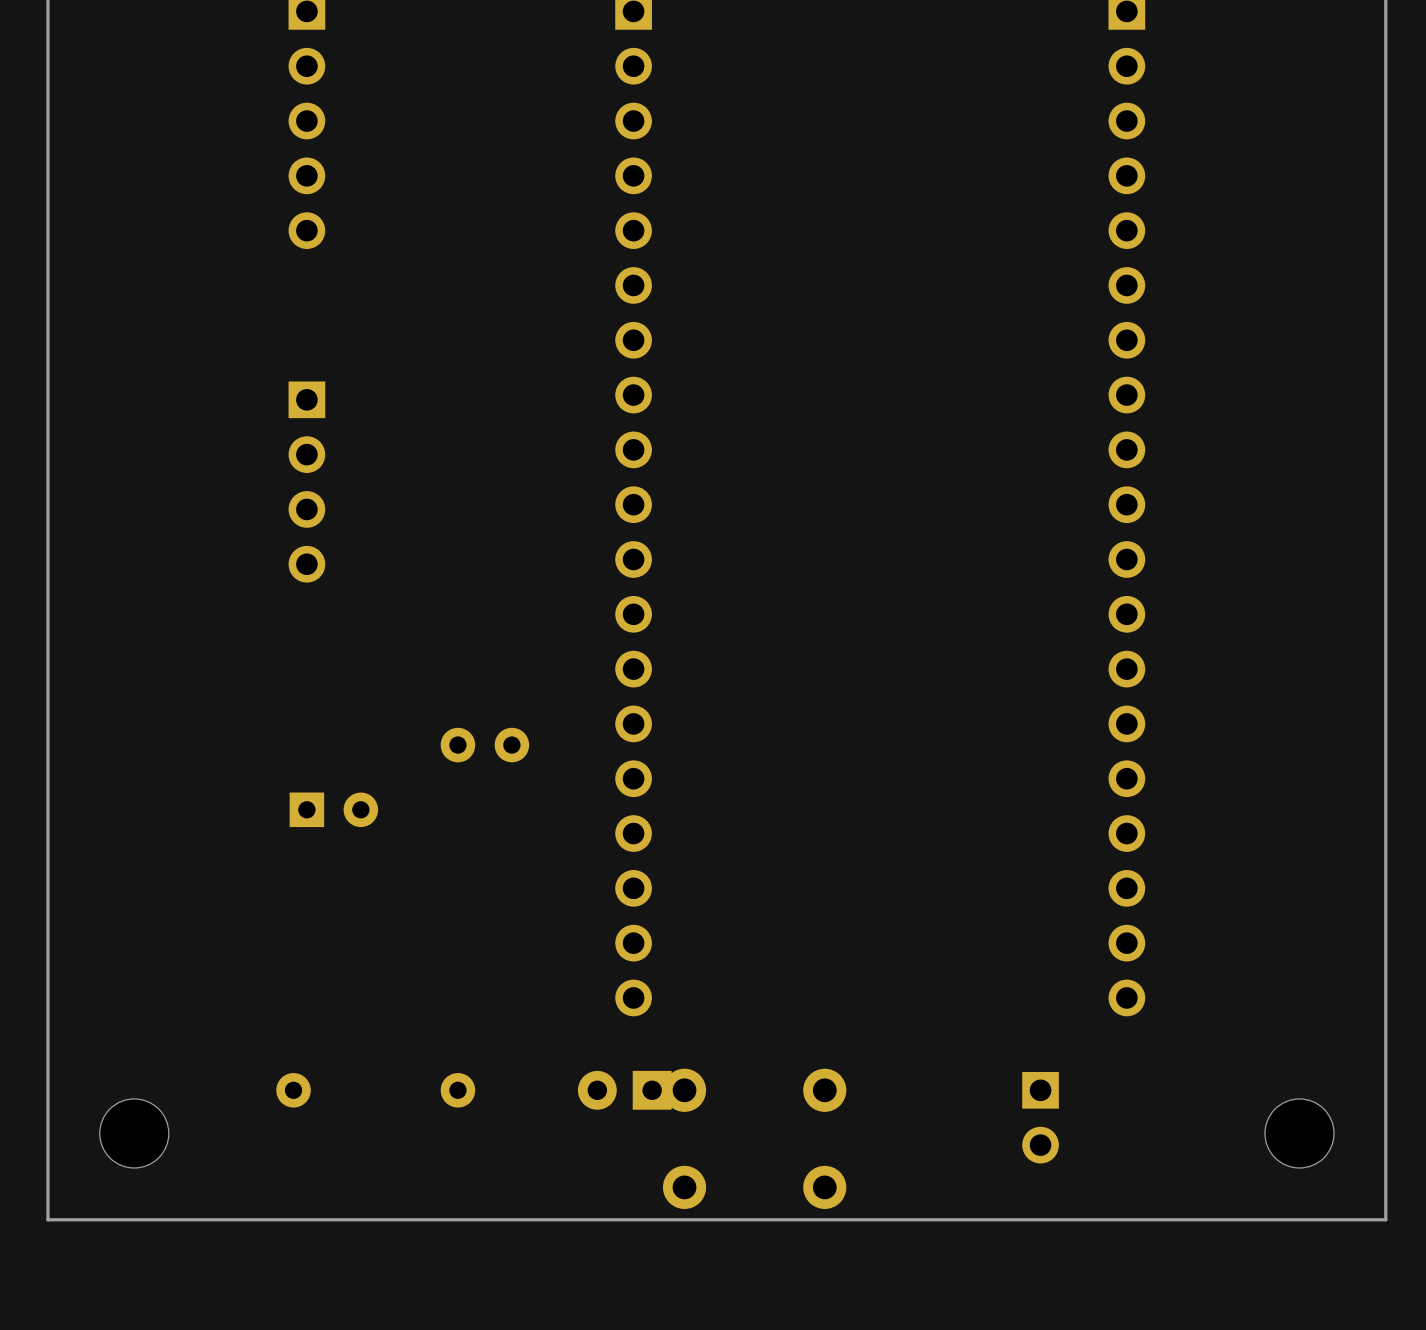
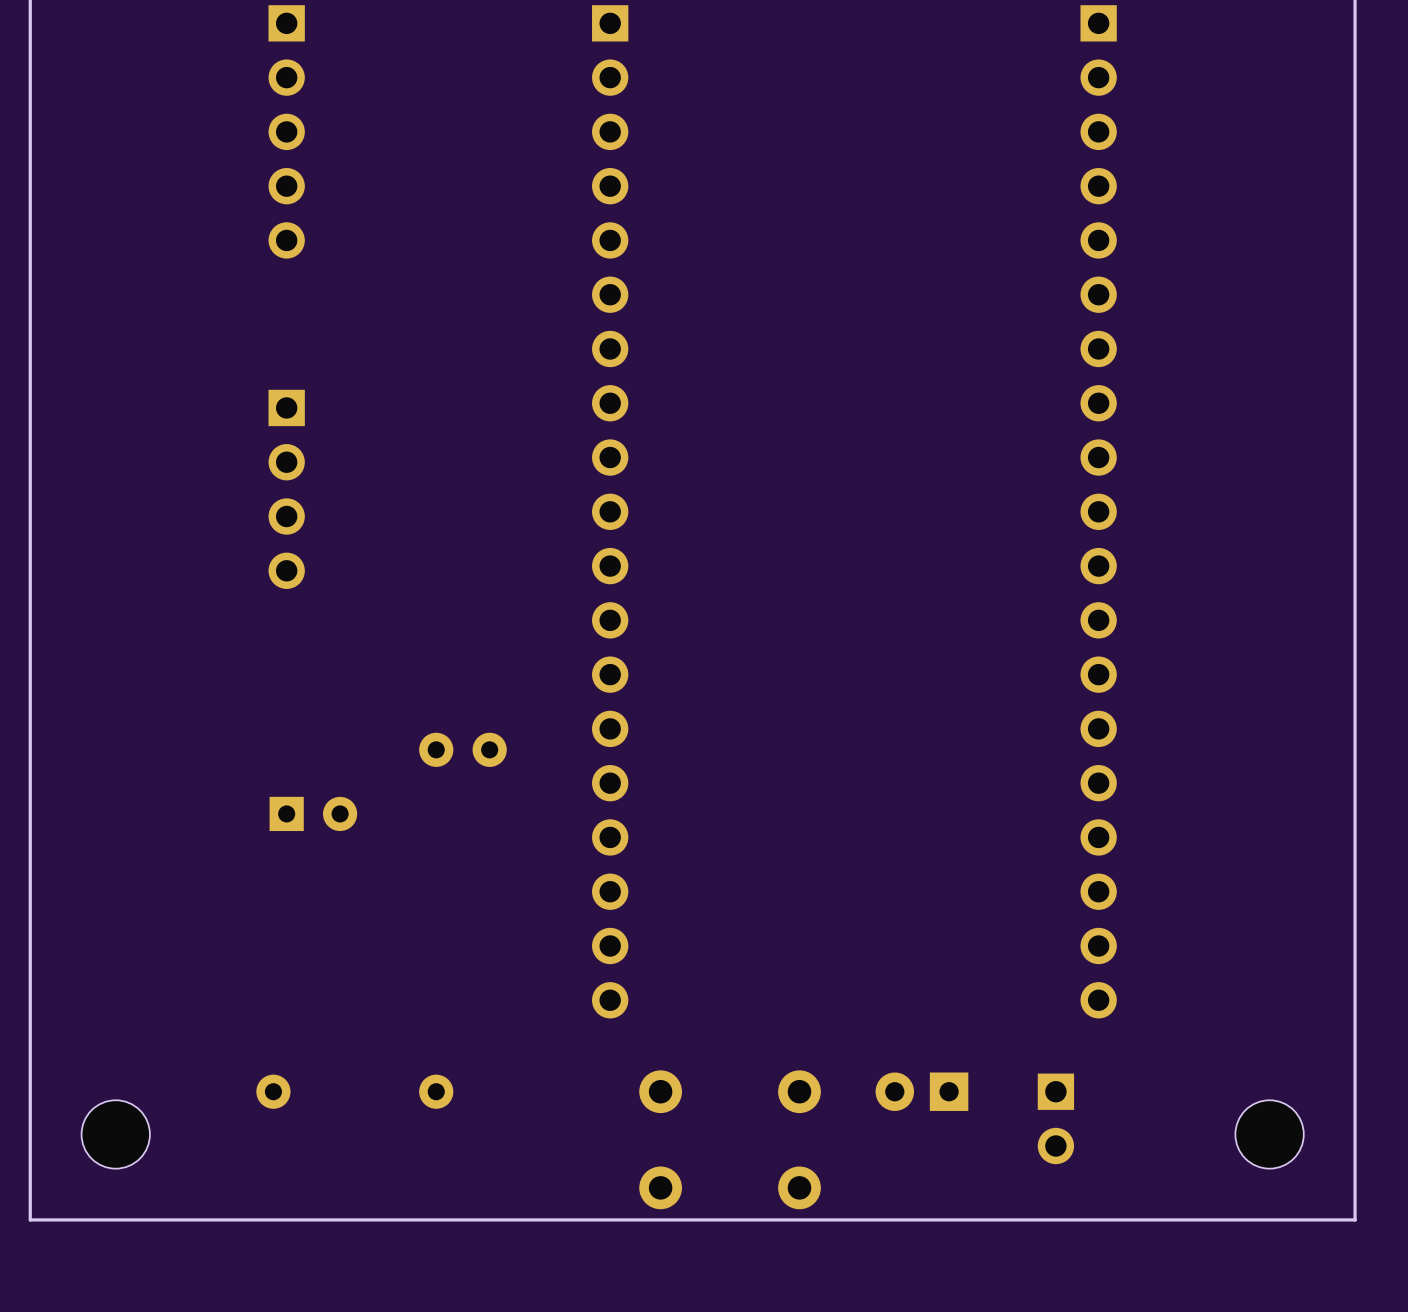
part position: (624, 1090) -> (921, 1091)
part position: (1040, 1117) -> (1055, 1118)

